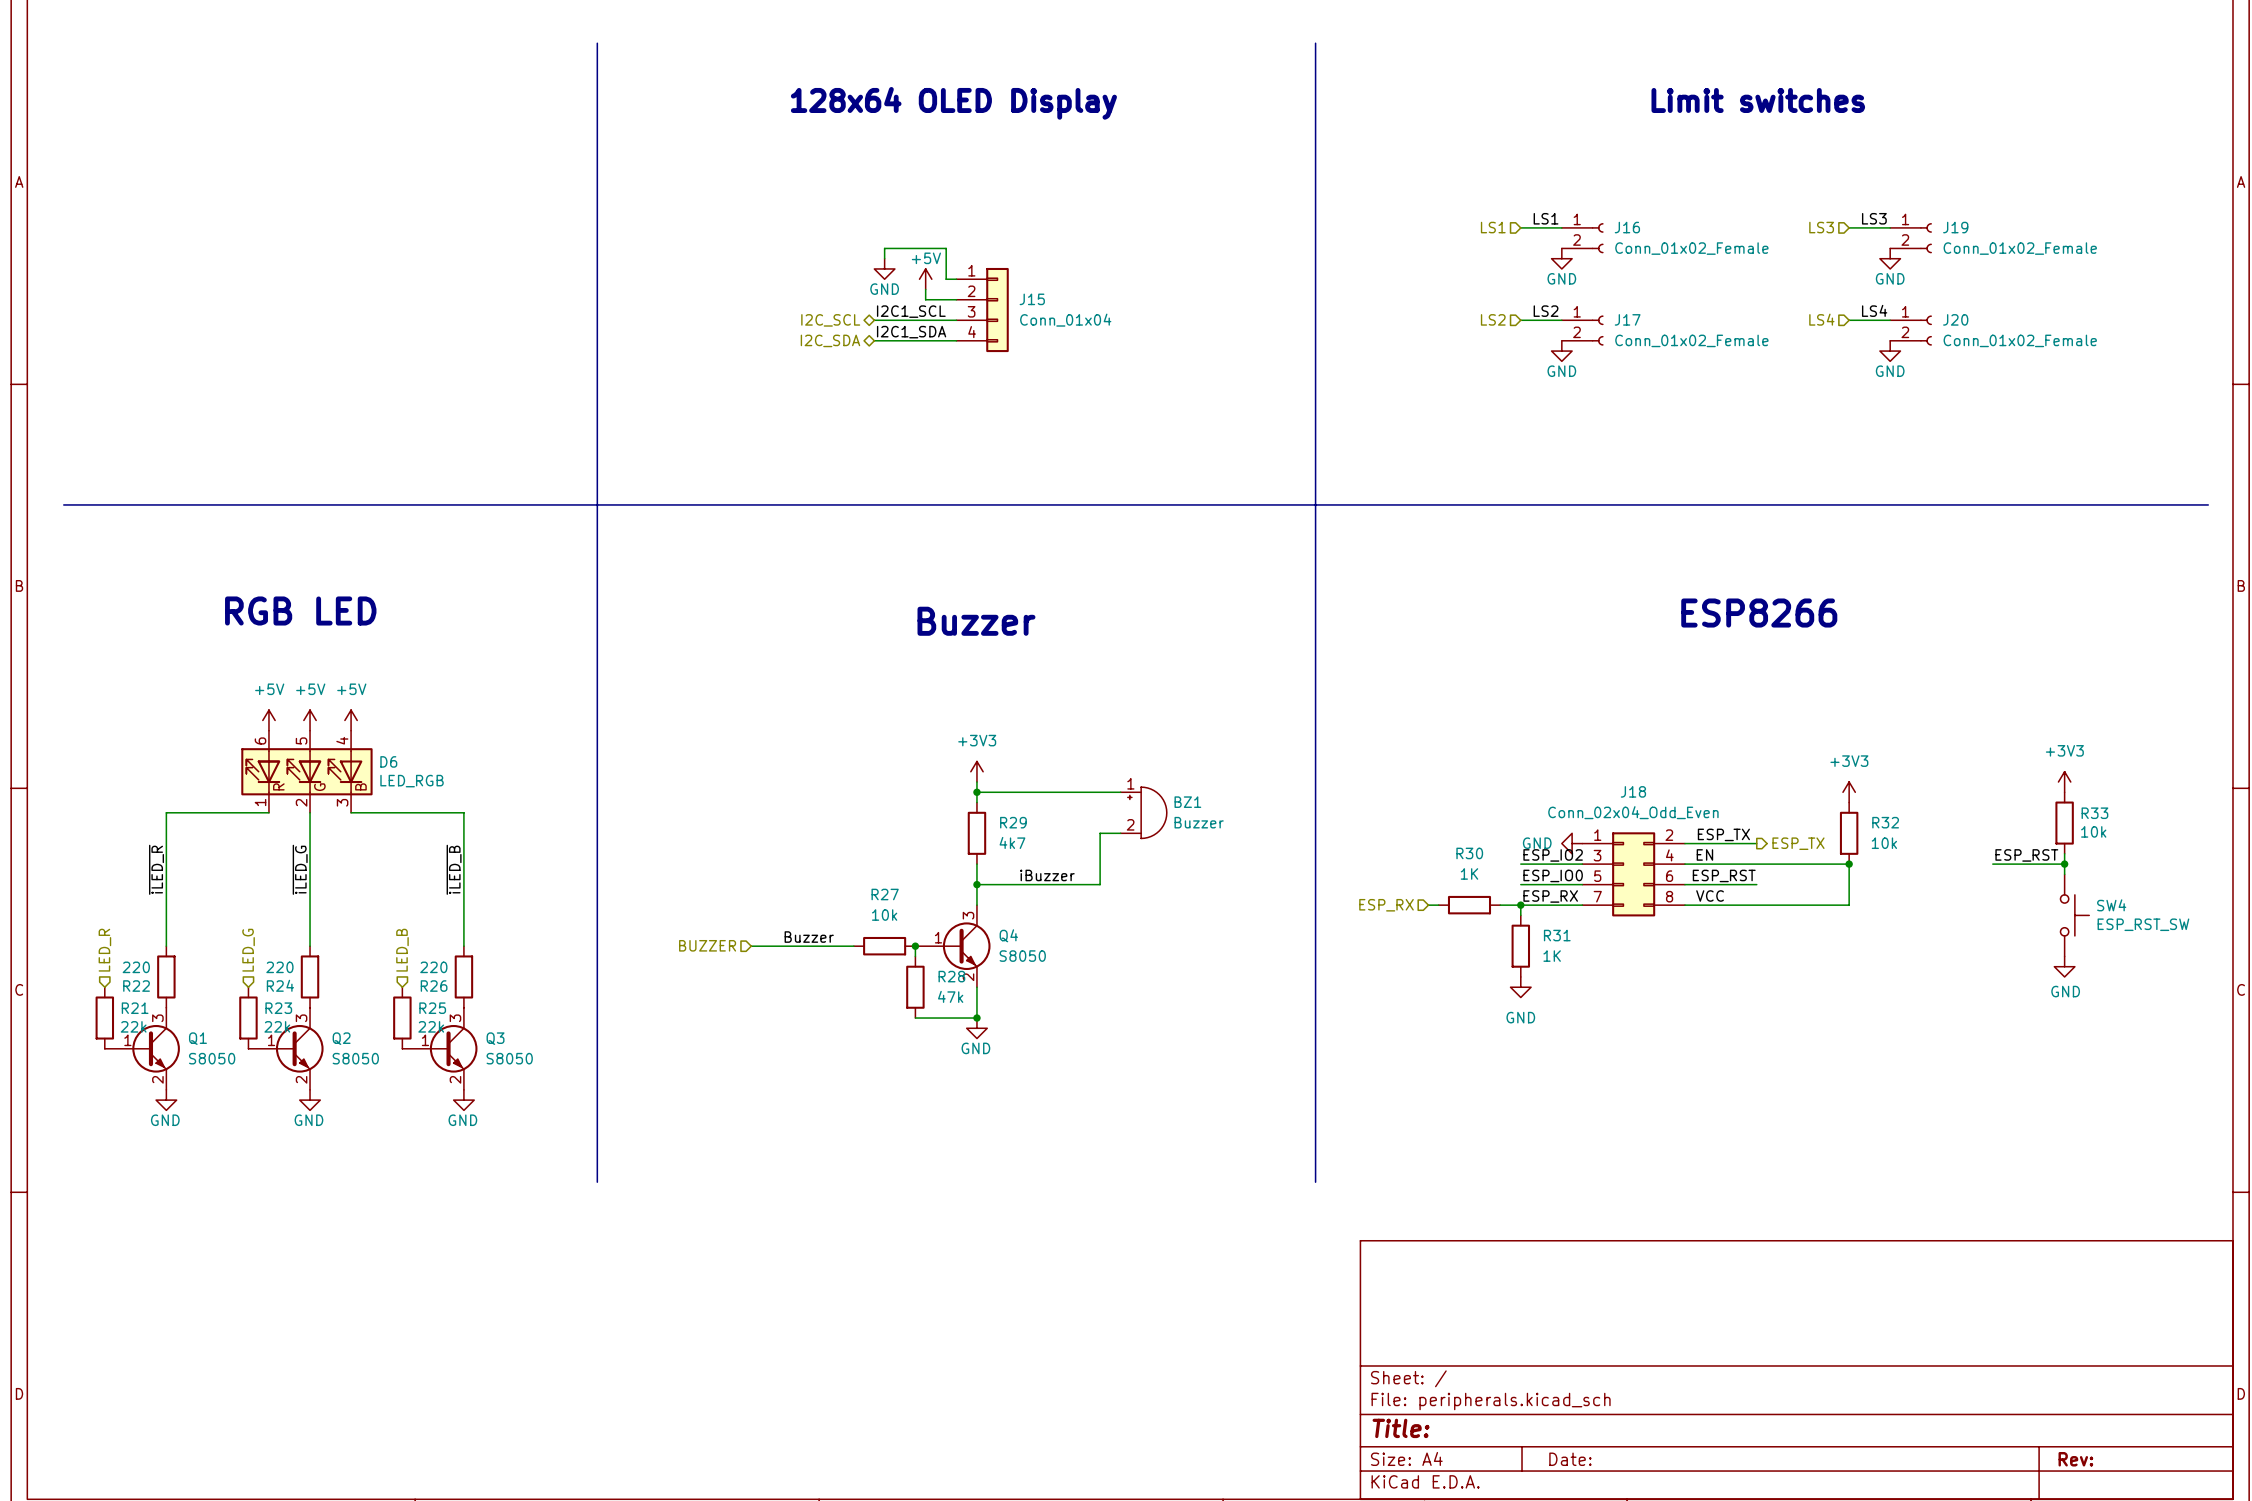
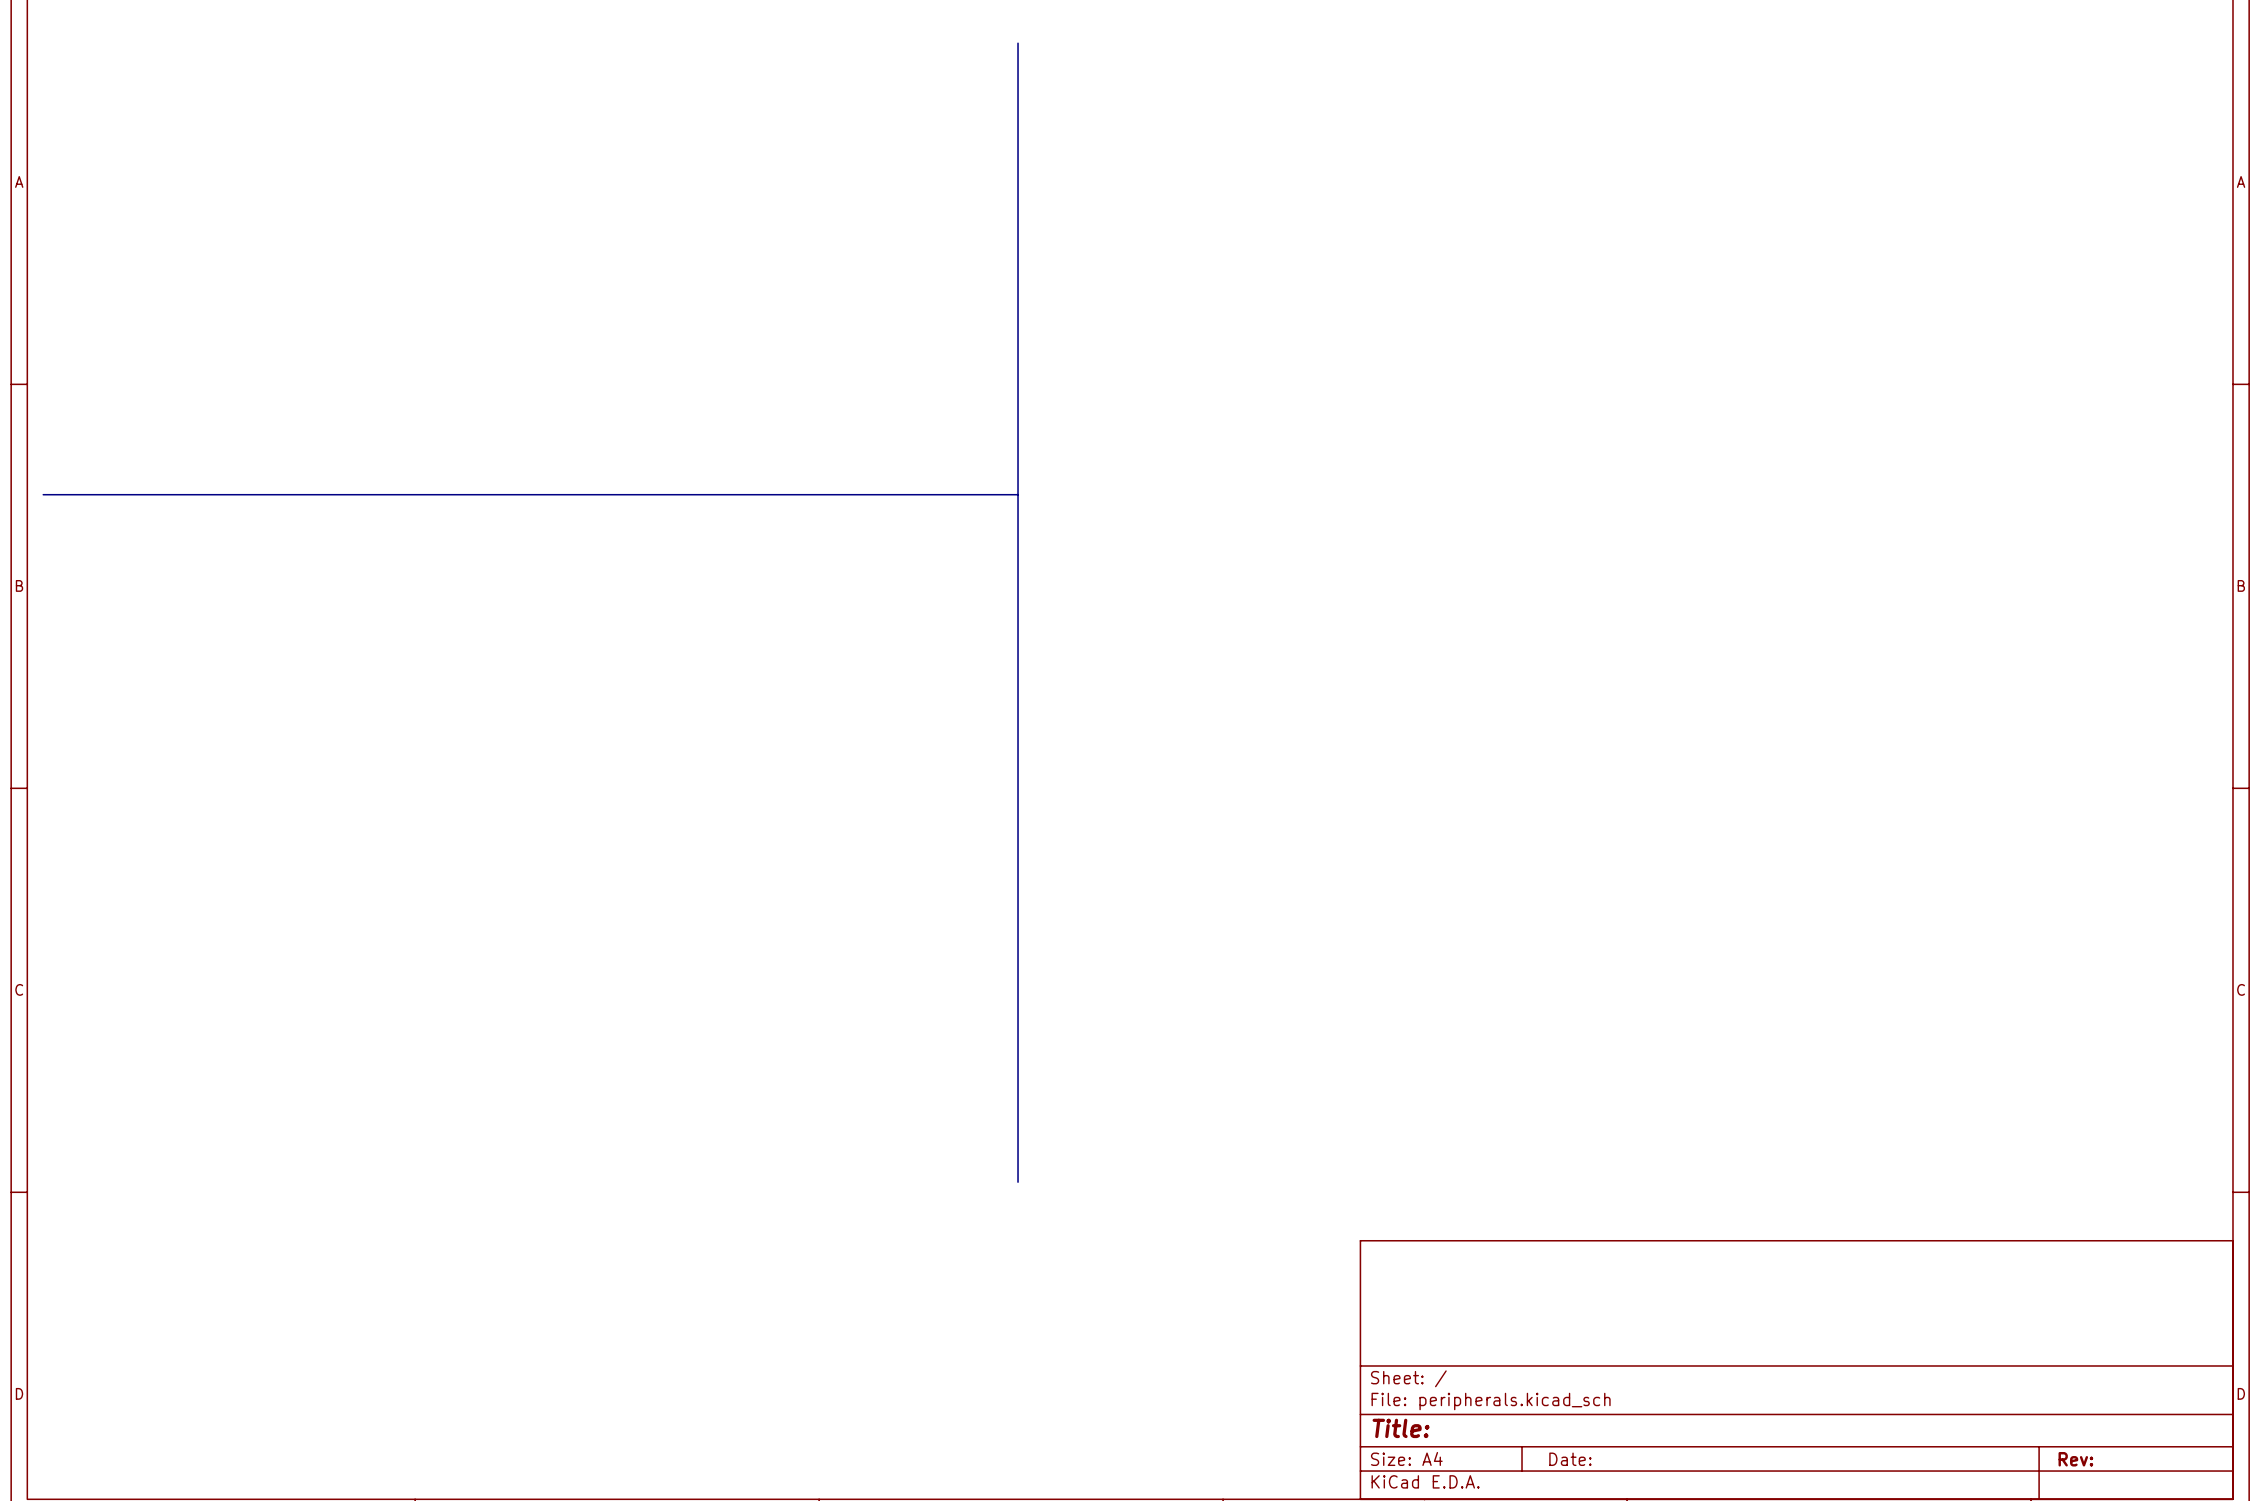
line: (597, 43) (597, 1182) -> none
line: none -> (1018, 43) (1018, 1182)
line: (1315, 43) (1315, 1182) -> none
text: Limit switches (1758, 100) -> none
text: 128x64 OLED Display (953, 103) -> none
label: LS1 (1546, 218) -> none
label: LS3 (1874, 218) -> none
hierarchical label: LS1 (1493, 227) -> none
wire: (1520, 227) (1561, 227) -> none
hierarchical label: LS3 (1821, 227) -> none
wire: (1849, 227) (1890, 227) -> none
J16: Conn_01x02_Female (1582, 238) -> none
J19: Conn_01x02_Female (1911, 238) -> none
wire: (884, 258) (884, 248) (946, 248) (946, 279) (956, 279) -> none
power symbol: GND (1561, 258) -> none
power symbol: GND (1890, 258) -> none
power symbol: GND (884, 268) -> none
power symbol: +5V (925, 279) -> none
wire: (925, 289) (925, 299) (956, 299) -> none
J15: Conn_01x04 (982, 310) -> none
label: LS4 (1874, 310) -> none
label: I2C1_SCL (911, 311) -> none
label: LS2 (1546, 311) -> none
hierarchical label: LS2 (1493, 319) -> none
hierarchical label: LS4 (1821, 319) -> none
hierarchical label: I2C_SCL (830, 320) -> none
wire: (874, 320) (956, 320) -> none
wire: (1520, 320) (1561, 320) -> none
wire: (1849, 320) (1890, 320) -> none
J17: Conn_01x02_Female (1582, 330) -> none
J20: Conn_01x02_Female (1911, 330) -> none
label: I2C1_SDA (911, 332) -> none
hierarchical label: I2C_SDA (830, 340) -> none
wire: (874, 340) (956, 340) -> none
power symbol: GND (1561, 351) -> none
power symbol: GND (1890, 351) -> none
line: none -> (43, 494) (1018, 494)
line: (63, 504) (2208, 504) -> none
text: RGB LED (300, 611) -> none
text: ESP8266 (1759, 613) -> none
text: Buzzer (976, 621) -> none
power symbol: +5V (268, 720) -> none
power symbol: +5V (310, 720) -> none
power symbol: +5V (351, 720) -> none
D6: LED_RGB (306, 771) -> none
power symbol: +3V3 (976, 771) -> none
wire: (976, 782) (976, 802) -> none
power symbol: +3V3 (2064, 782) -> none
wire: (976, 792) (1120, 792) -> none
junction: (976, 792) -> none
power symbol: +3V3 (1849, 792) -> none
wire: (268, 812) (166, 812) (166, 946) -> none
wire: (310, 812) (310, 946) -> none
wire: (351, 812) (463, 812) (463, 946) -> none
BZ1: Buzzer (1143, 812) -> none
R33: 10k (2064, 823) -> none
R29: 4k7 (976, 833) -> none
wire: (1120, 833) (1100, 833) (1100, 884) (976, 884) -> none
R32: 10k (1849, 833) -> none
label: ESP_TX (1723, 834) -> none
power symbol: GND (1572, 843) -> none
wire: (1684, 843) (1756, 843) -> none
hierarchical label: ESP_TX (1798, 843) -> none
wire: (2064, 853) (2064, 874) -> none
label: EN (1704, 854) -> none
label: ESP_IO2 (1553, 855) -> none
label: ESP_RST (2026, 855) -> none
wire: (976, 864) (976, 905) -> none
wire: (1520, 864) (1582, 864) -> none
wire: (1684, 864) (1849, 864) (1849, 905) (1684, 905) -> none
junction: (1849, 864) -> none
wire: (1992, 864) (2064, 864) -> none
junction: (2064, 864) -> none
label: ~{iLED_R} (156, 869) -> none
label: ~{iLED_G} (300, 869) -> none
label: ~{iLED_B} (454, 869) -> none
J18: Conn_02x04_Odd_Even (1633, 874) -> none
label: iBuzzer (1047, 875) -> none
label: ESP_IO0 (1553, 875) -> none
label: ESP_RST (1724, 875) -> none
junction: (976, 884) -> none
wire: (1520, 884) (1582, 884) -> none
wire: (1684, 884) (1756, 884) -> none
label: VCC (1710, 895) -> none
label: ESP_RX (1550, 896) -> none
hierarchical label: ESP_RX (1386, 905) -> none
wire: (1428, 905) (1438, 905) -> none
R30: 1K (1469, 905) -> none
wire: (1500, 905) (1582, 905) -> none
wire: (1520, 905) (1520, 915) -> none
junction: (1520, 905) -> none
SW4: ESP_RST_SW (2074, 915) -> none
label: Buzzer (809, 937) -> none
hierarchical label: BUZZER (707, 945) -> none
wire: (751, 946) (853, 946) -> none
R27: 10k (884, 946) -> none
wire: (915, 946) (915, 956) -> none
junction: (915, 946) -> none
Q4: S8050 (952, 946) -> none
R31: 1K (1520, 946) -> none
hierarchical label: LED_R (104, 950) -> none
hierarchical label: LED_G (248, 950) -> none
hierarchical label: LED_B (402, 950) -> none
power symbol: GND (2064, 966) -> none
R22: 220 (166, 976) -> none
R24: 220 (310, 976) -> none
R26: 220 (463, 976) -> none
R28: 47k (915, 987) -> none
wire: (976, 987) (976, 1018) (915, 1018) -> none
power symbol: GND (1520, 987) -> none
R21: 22k (104, 1018) -> none
R23: 22k (248, 1018) -> none
R25: 22k (402, 1018) -> none
junction: (976, 1018) -> none
power symbol: GND (976, 1028) -> none
Q1: S8050 (142, 1048) -> none
Q2: S8050 (286, 1048) -> none
Q3: S8050 (439, 1048) -> none
power symbol: GND (166, 1100) -> none
power symbol: GND (310, 1100) -> none
power symbol: GND (463, 1100) -> none

